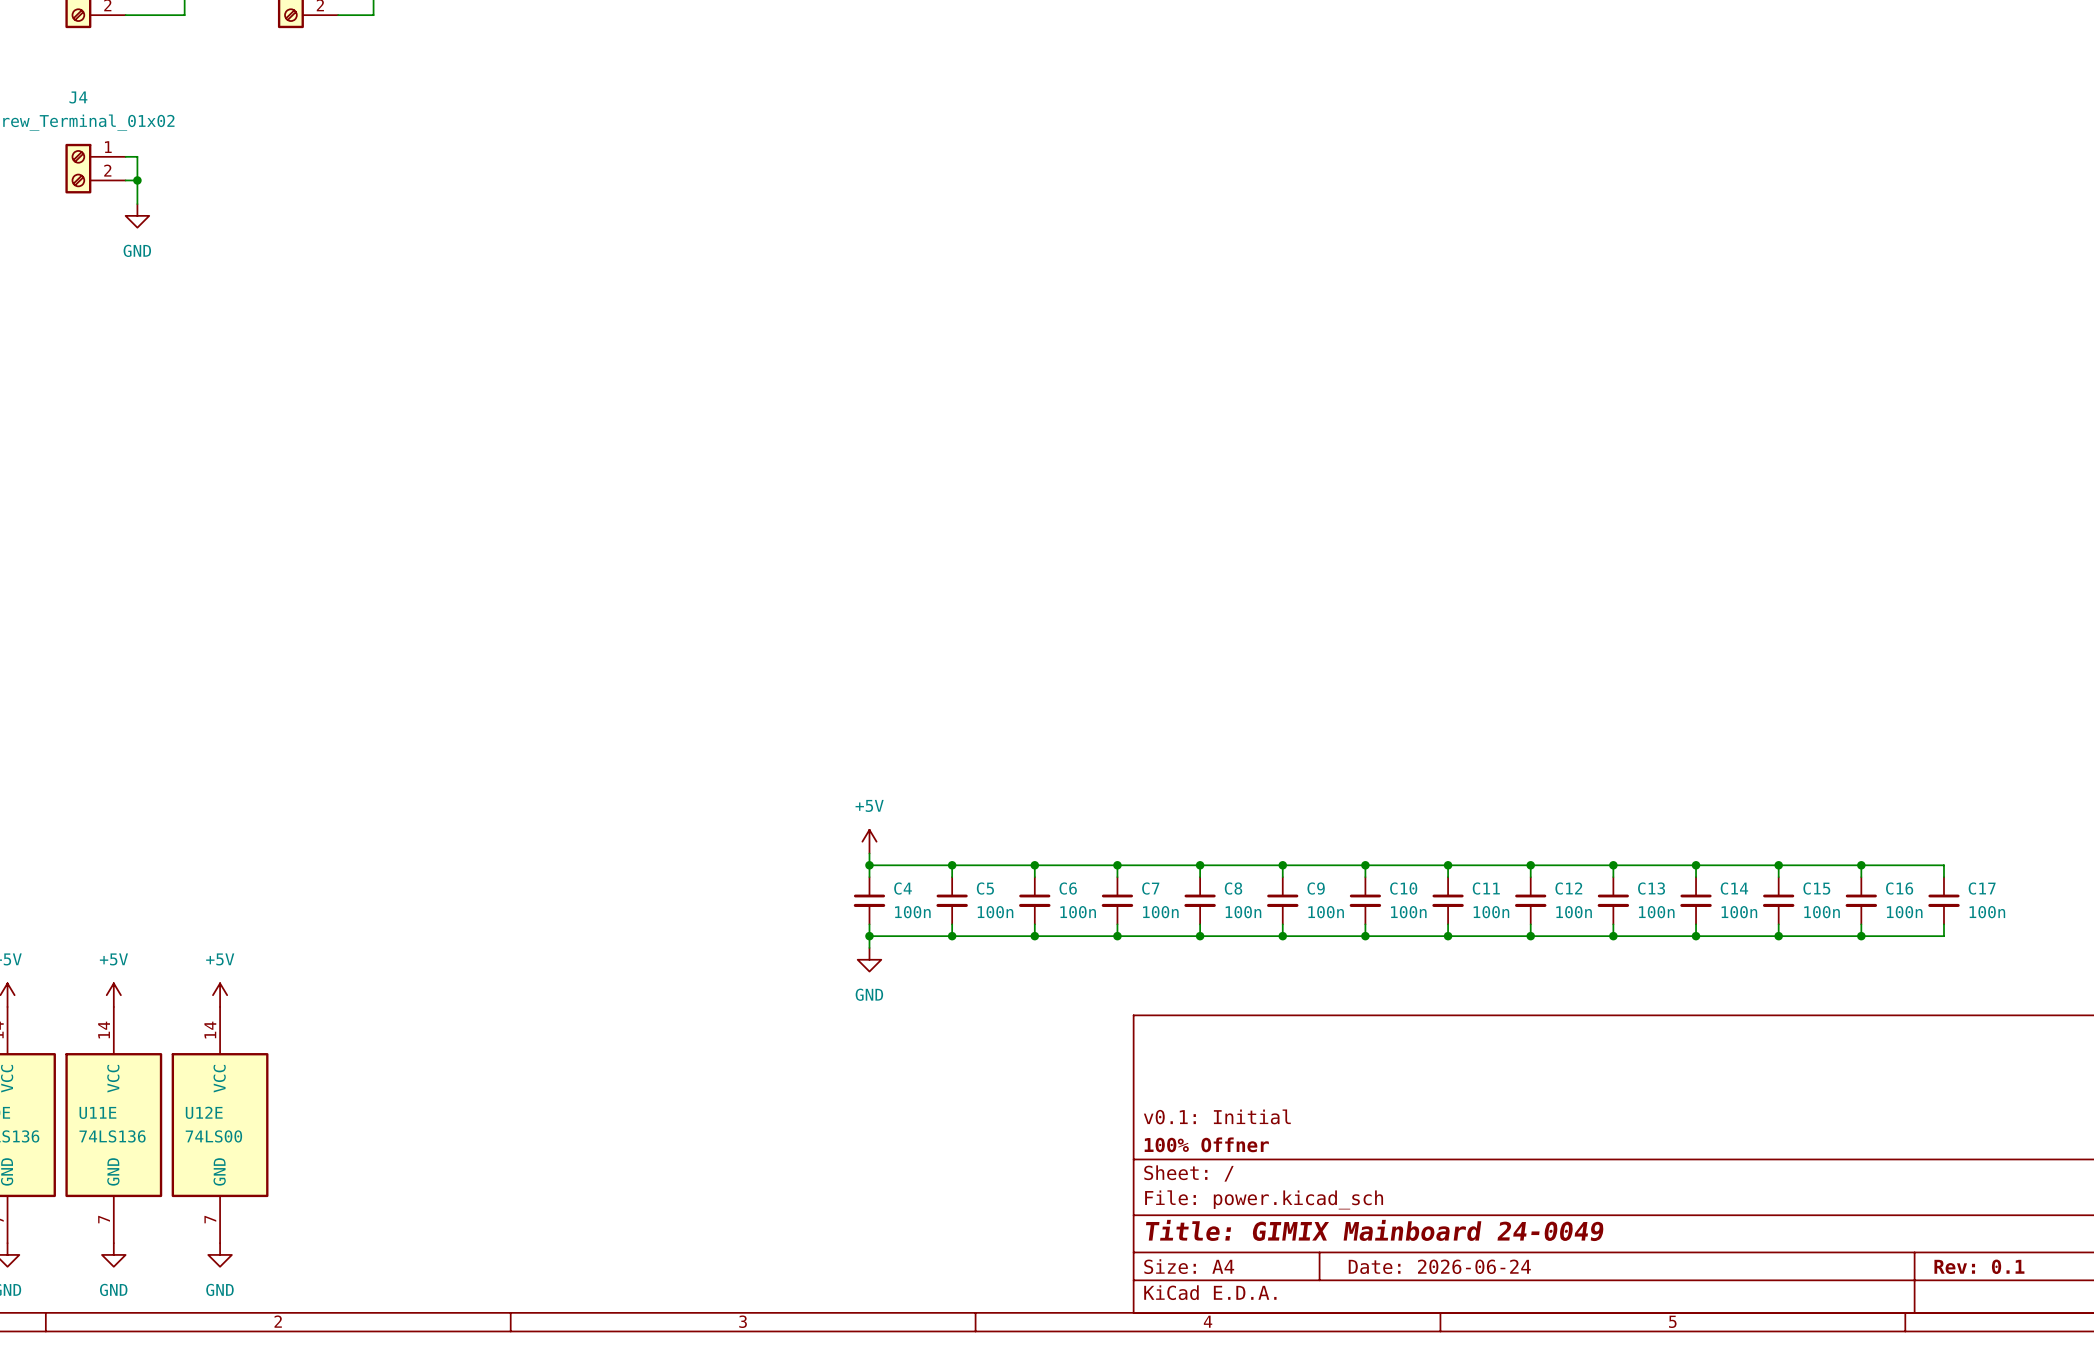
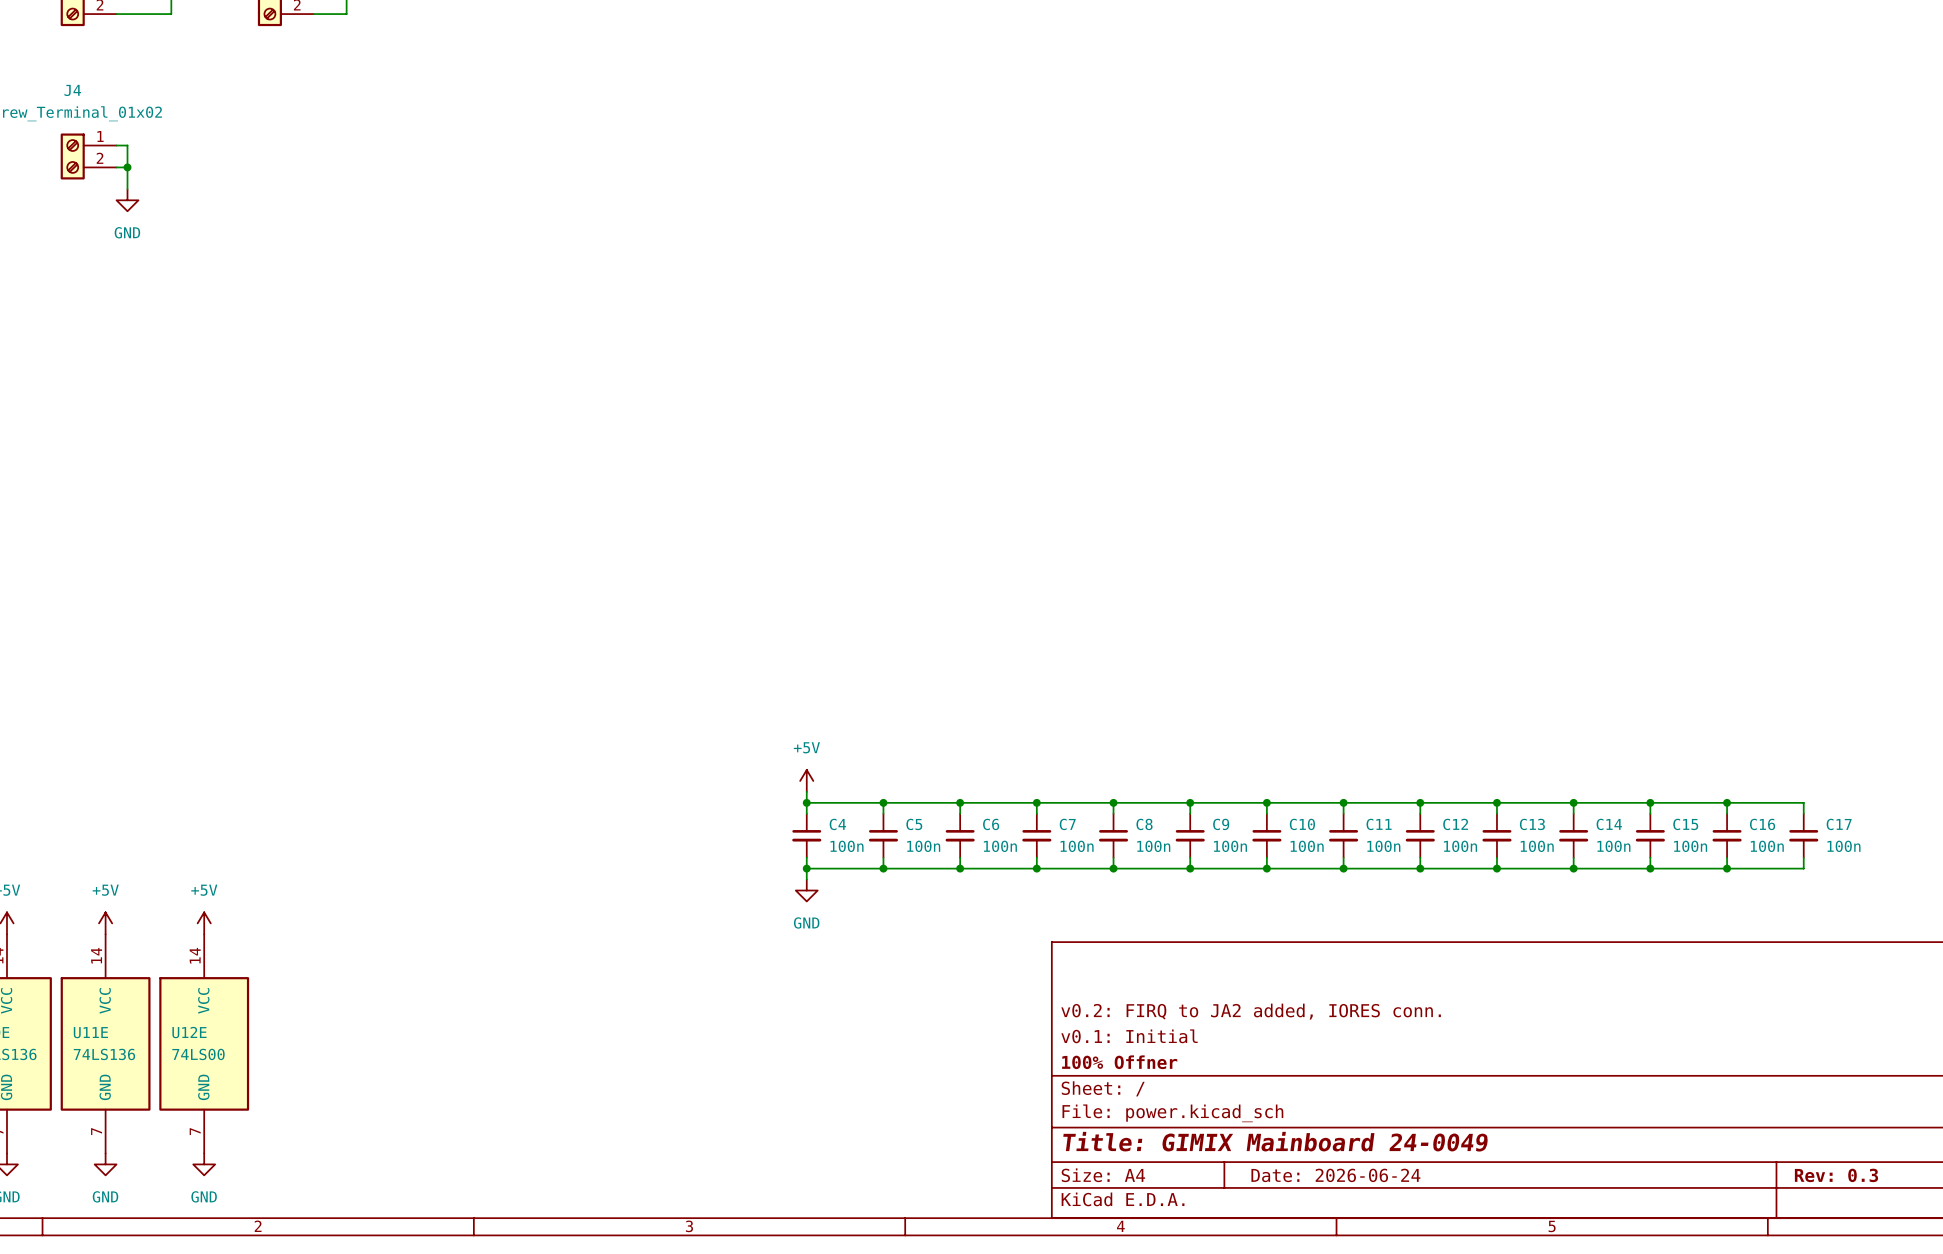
title block: none -> v0.2: FIRQ to JA2 added, IORES conn. (1251, 1011)
title block: Rev: 0.1 (1979, 1266) -> Rev: 0.3 (1836, 1175)

